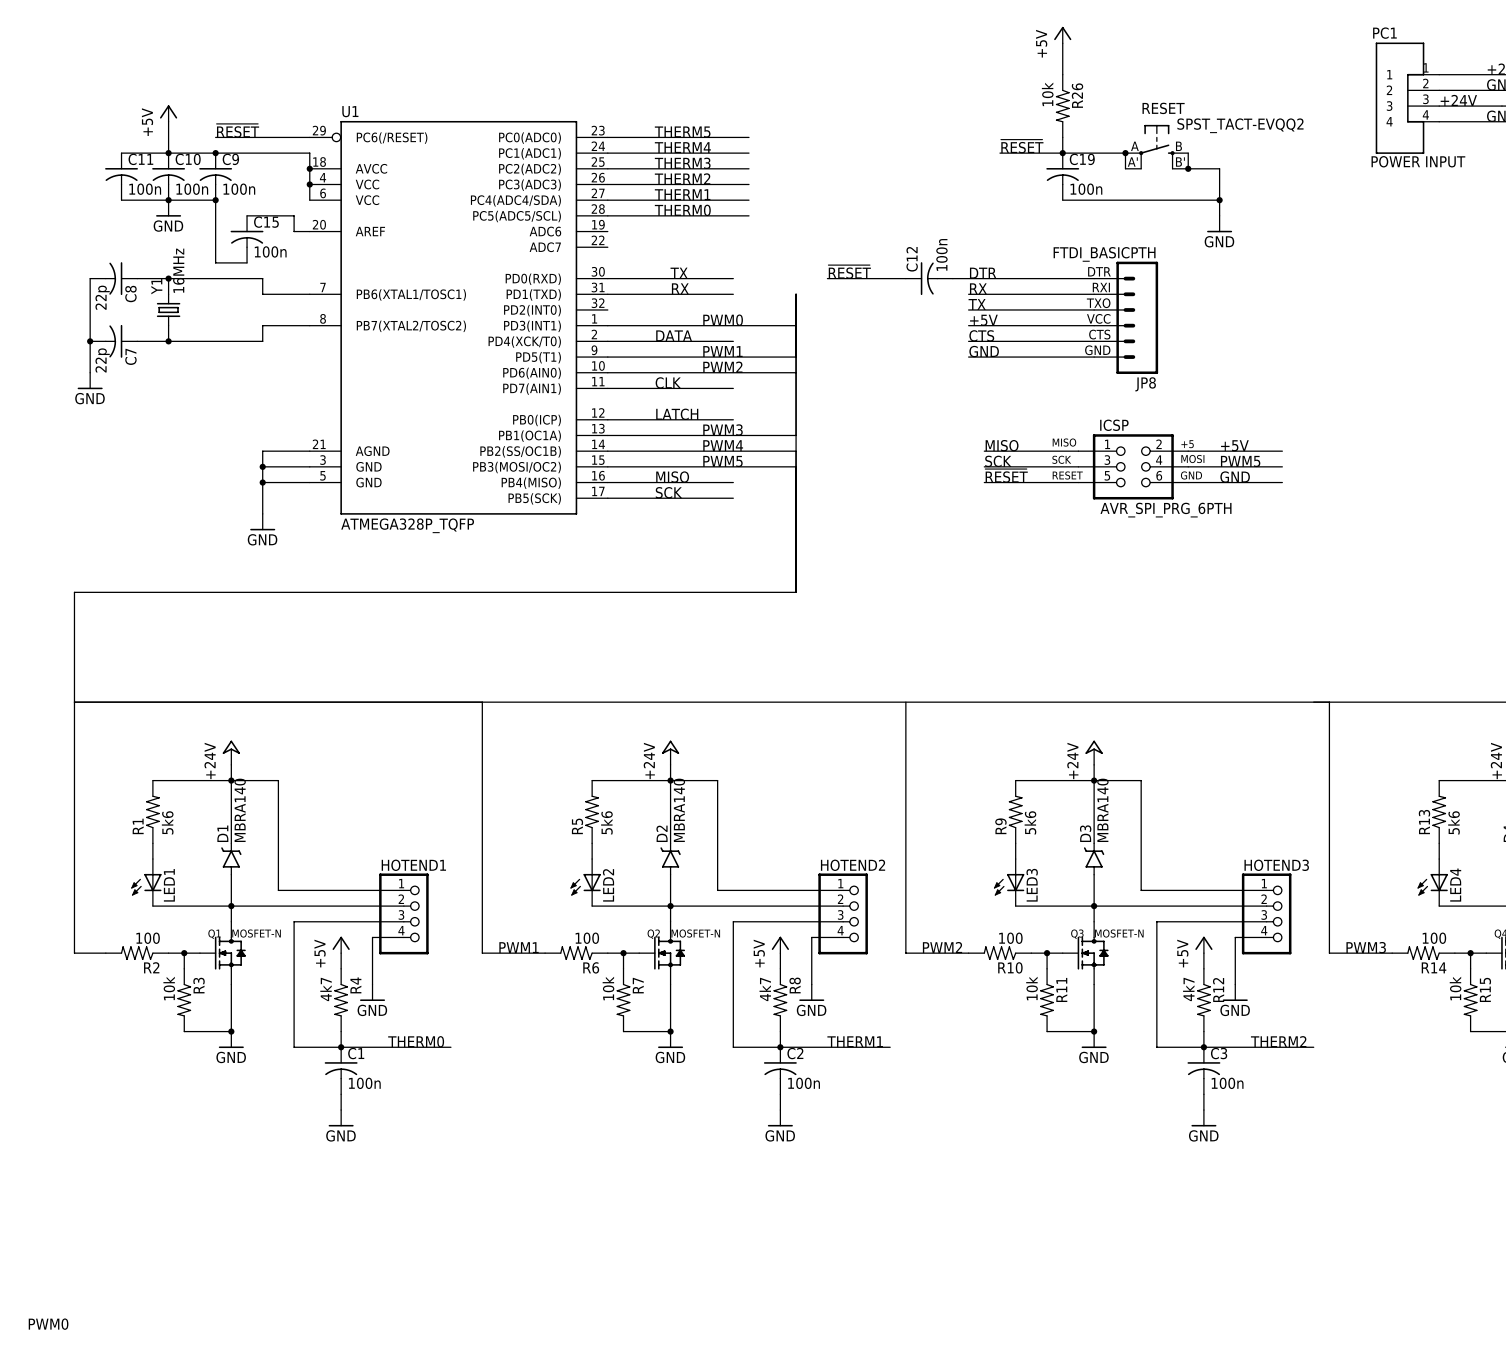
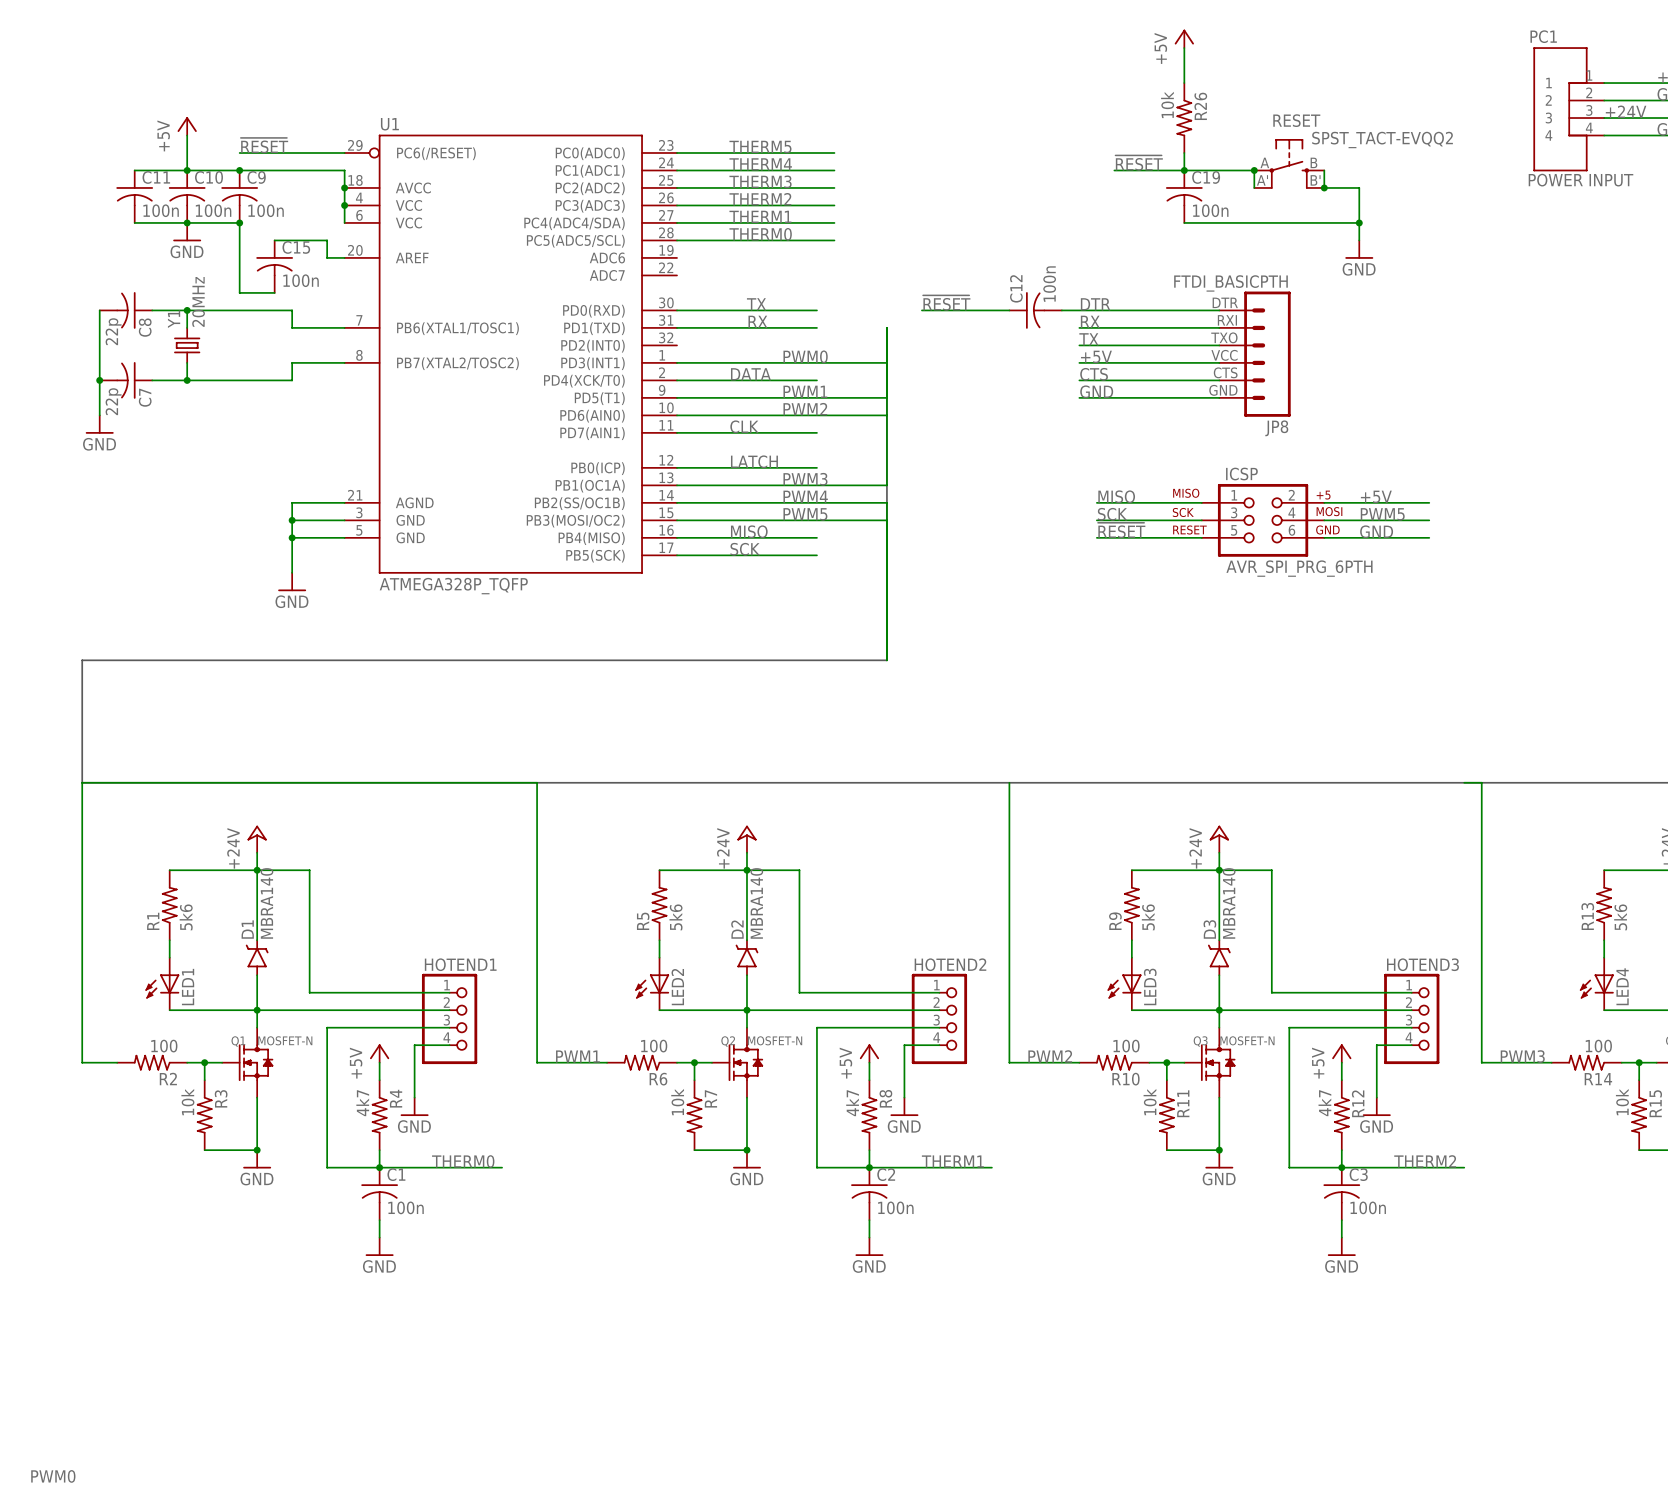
Y1 value: 16MHz (178, 270) -> 20MHz (198, 301)

